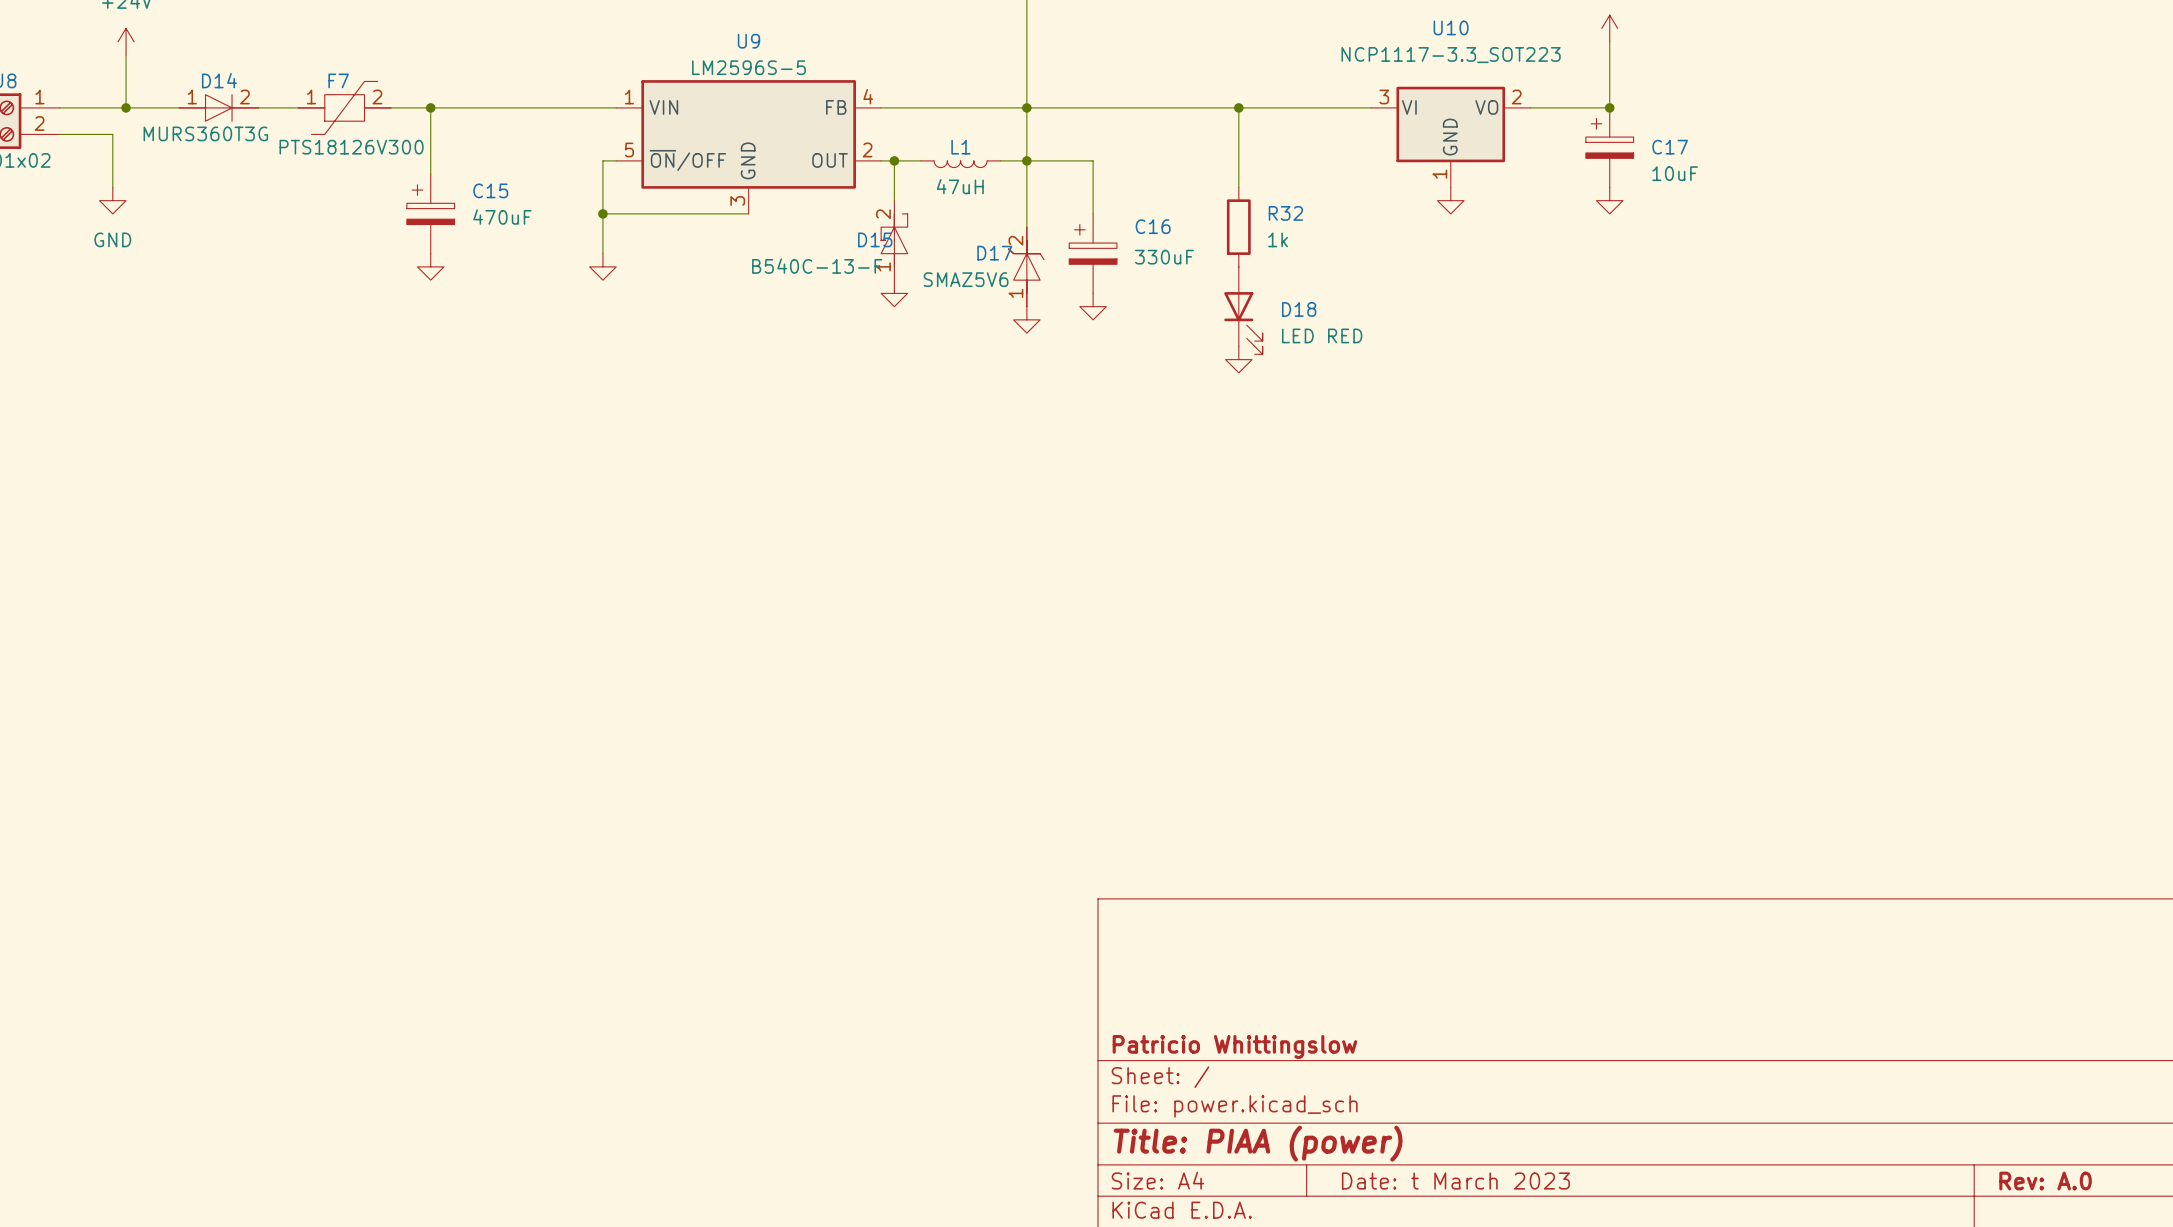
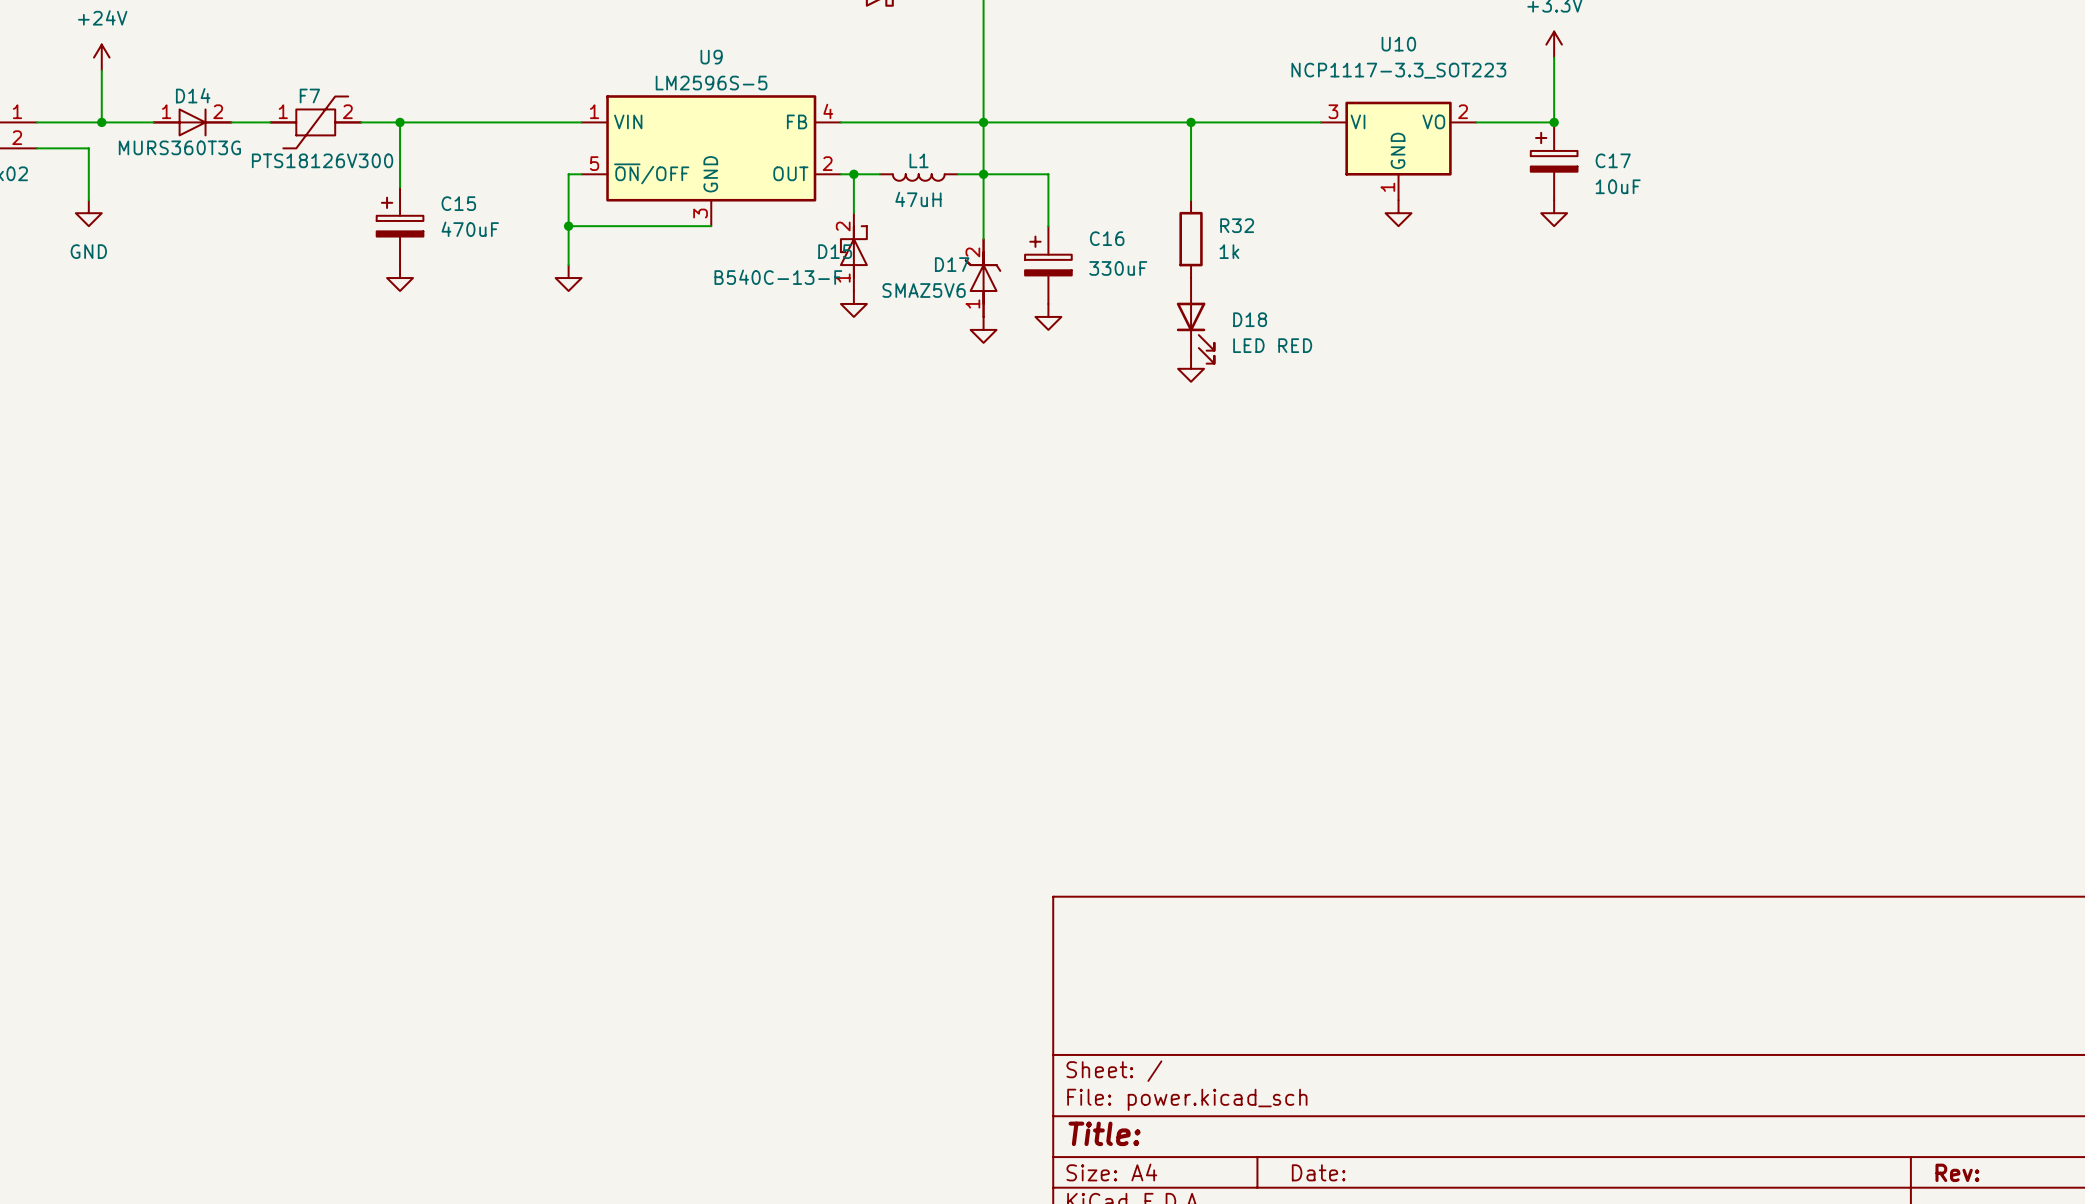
title block: Patricio Whittingslow (1234, 1046) -> none
title block: Title: PIAA (power) (1258, 1143) -> Title: (1104, 1133)
title block: Date: t March 2023 (1455, 1181) -> Date: (1318, 1172)
title block: Rev: A.0 (2045, 1181) -> Rev: (1957, 1172)

